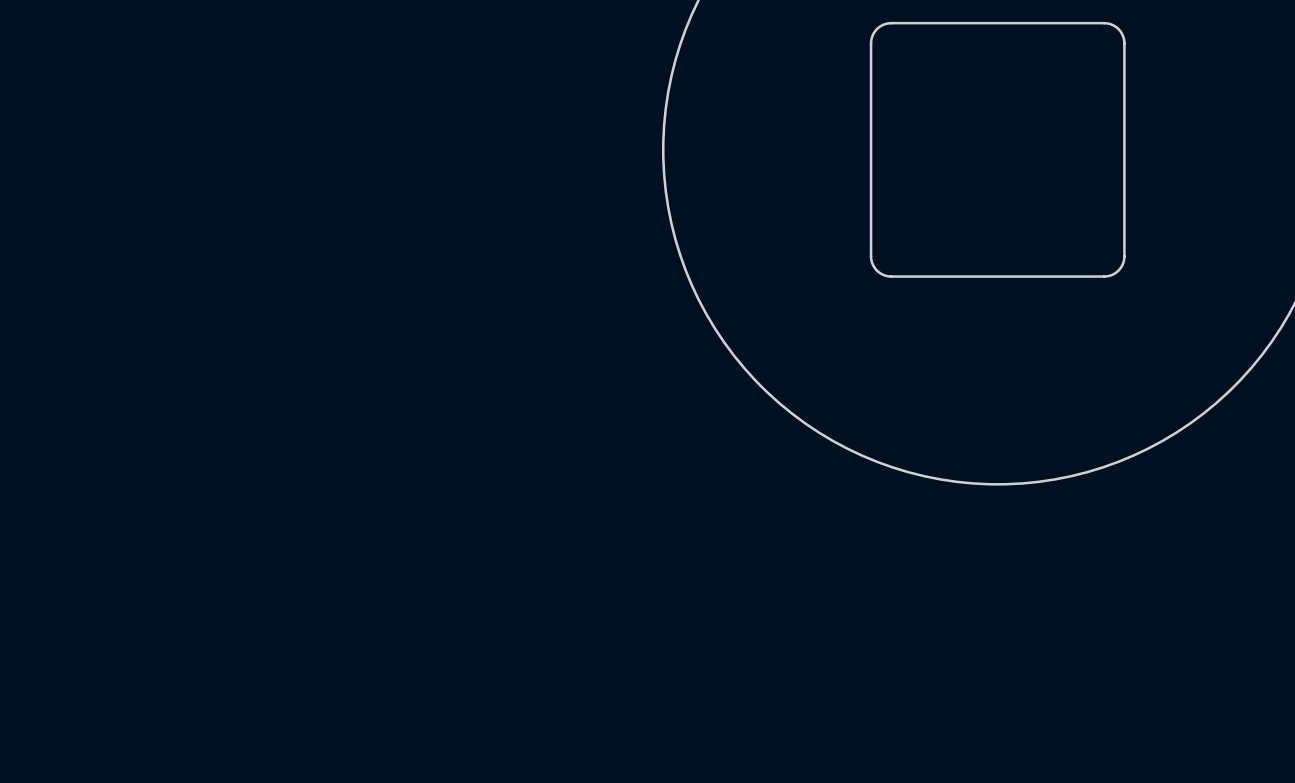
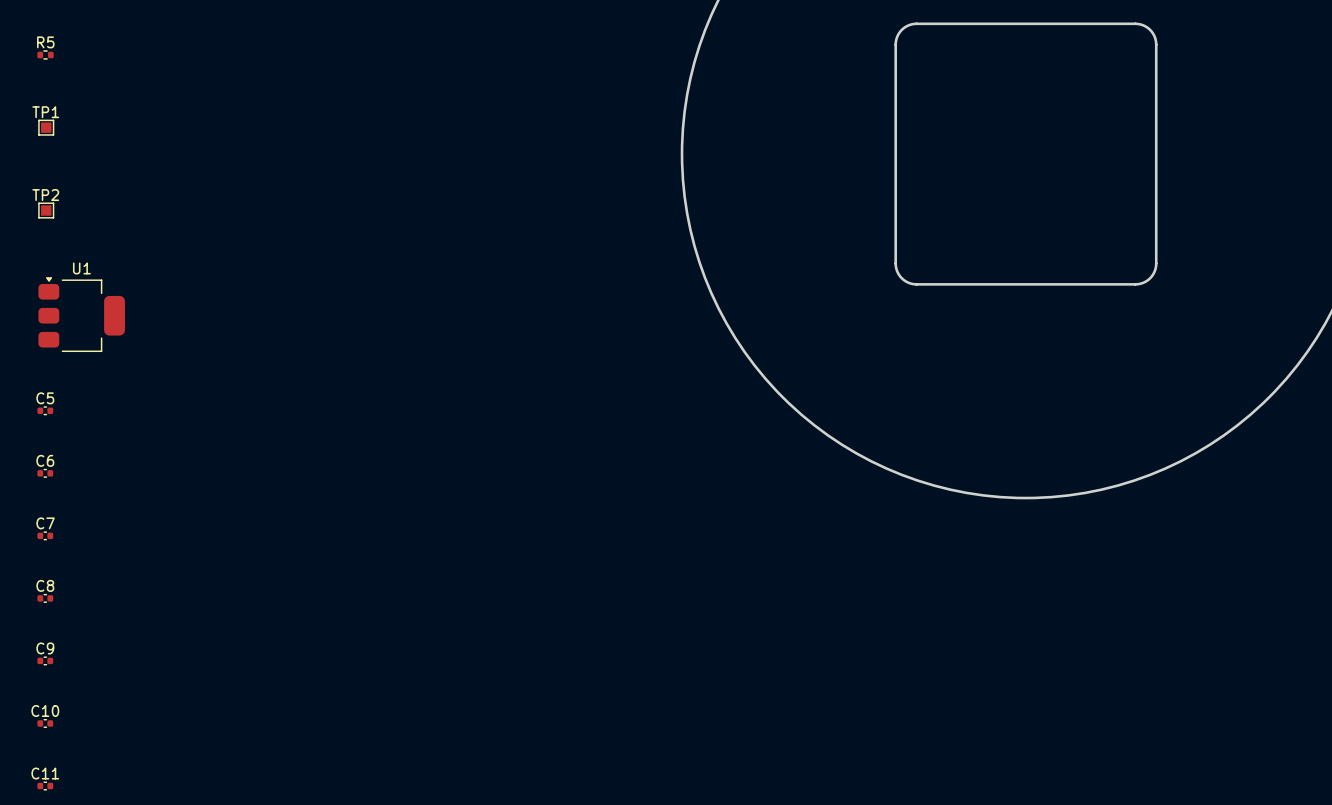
R5: none -> (45, 54)
TP1: none -> (46, 127)
TP2: none -> (46, 210)
U1: none -> (81, 314)
C5: none -> (45, 410)
C6: none -> (45, 473)
C7: none -> (45, 535)
C8: none -> (45, 598)
C9: none -> (45, 660)
C10: none -> (45, 723)
C11: none -> (45, 786)

